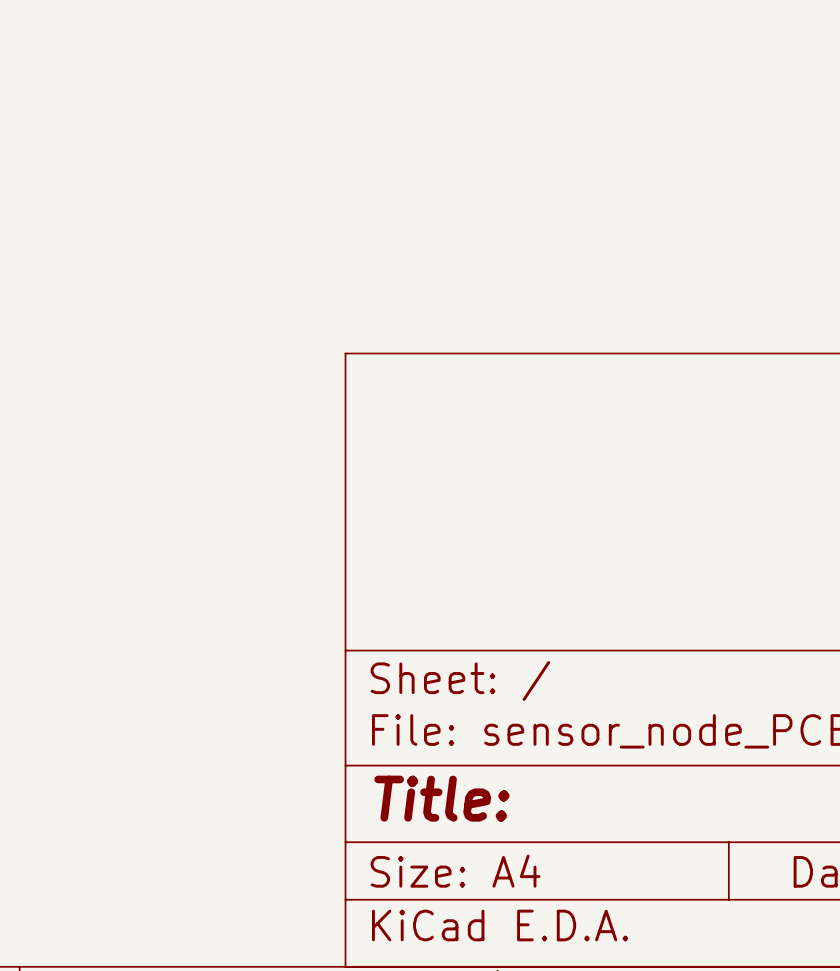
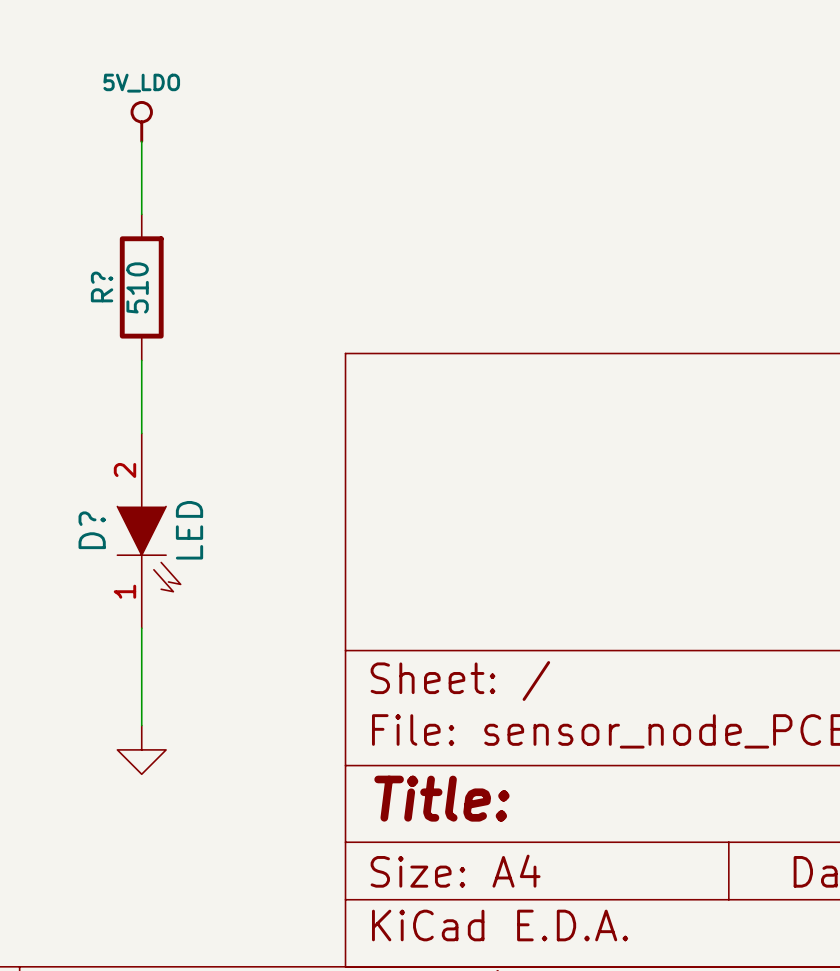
power symbol: none -> 5V_LDO (141, 121)
wire: none -> (141, 141) (141, 214)
R?: none -> 510 (141, 287)
wire: none -> (141, 360) (141, 433)
D?: none -> LED (149, 530)
wire: none -> (141, 628) (141, 725)
power symbol: none -> (141, 749)

